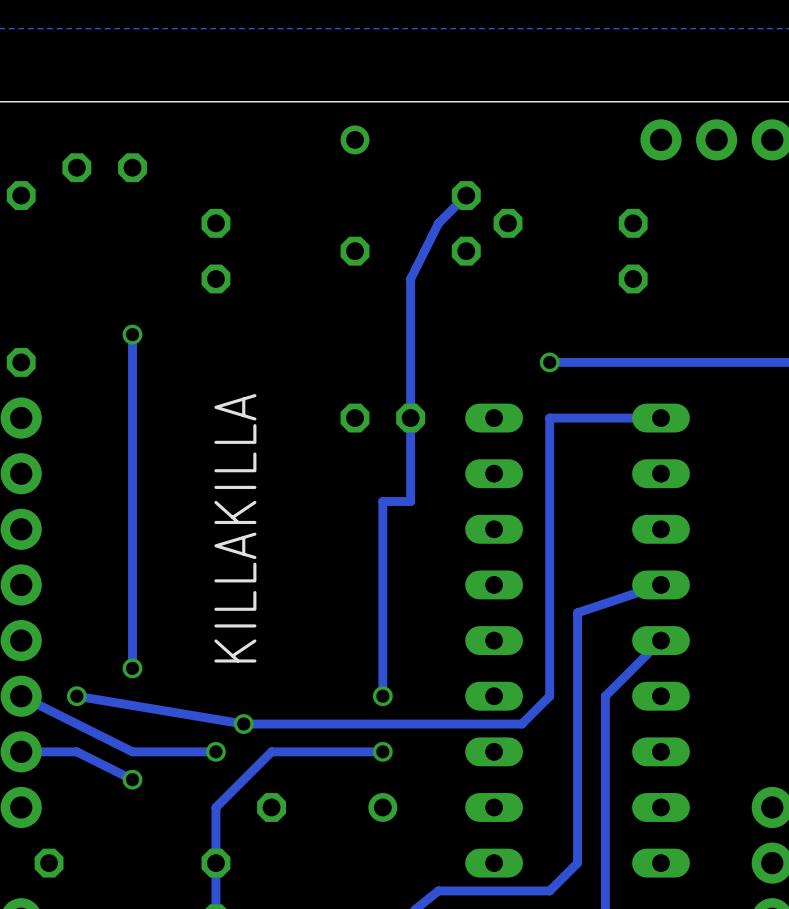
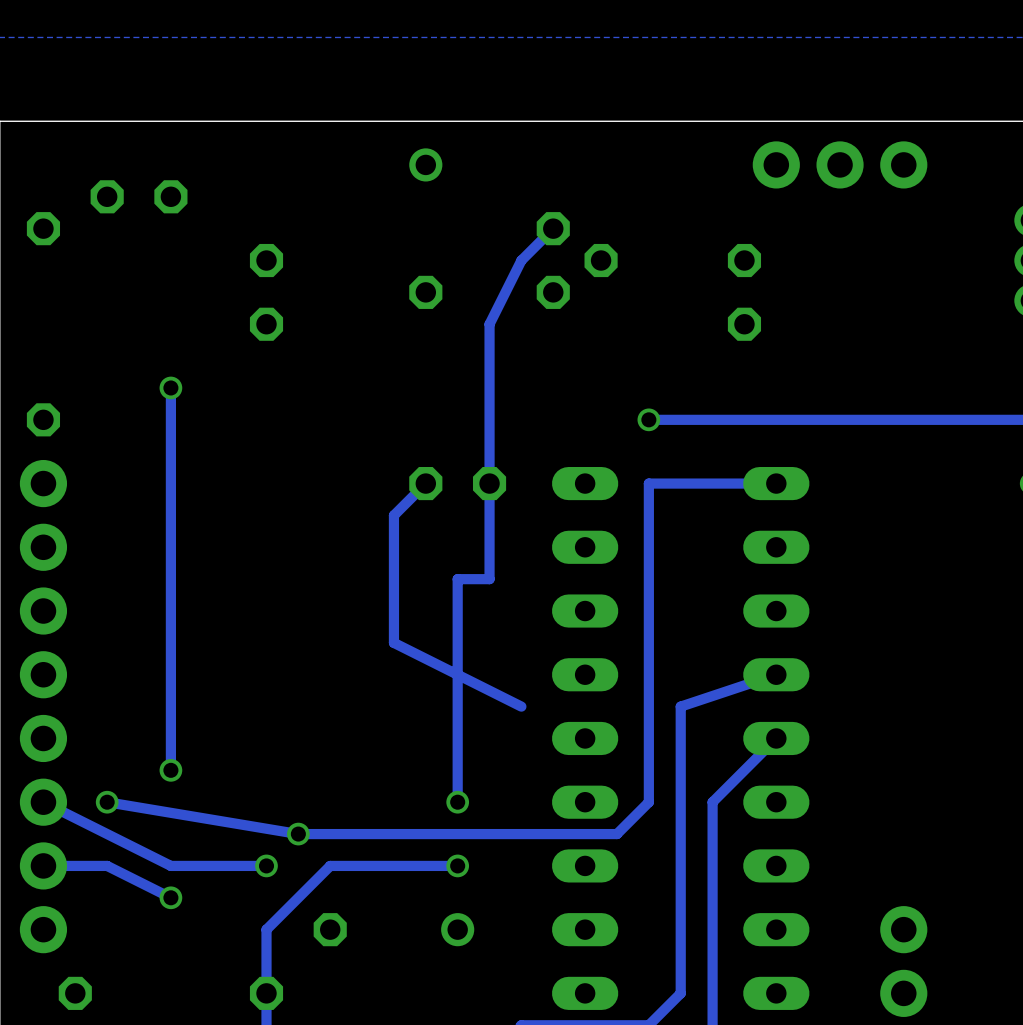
track: none -> (425, 483) (393, 515) (393, 642) (521, 706)
text: KILLAKILLA (235, 528) -> none

